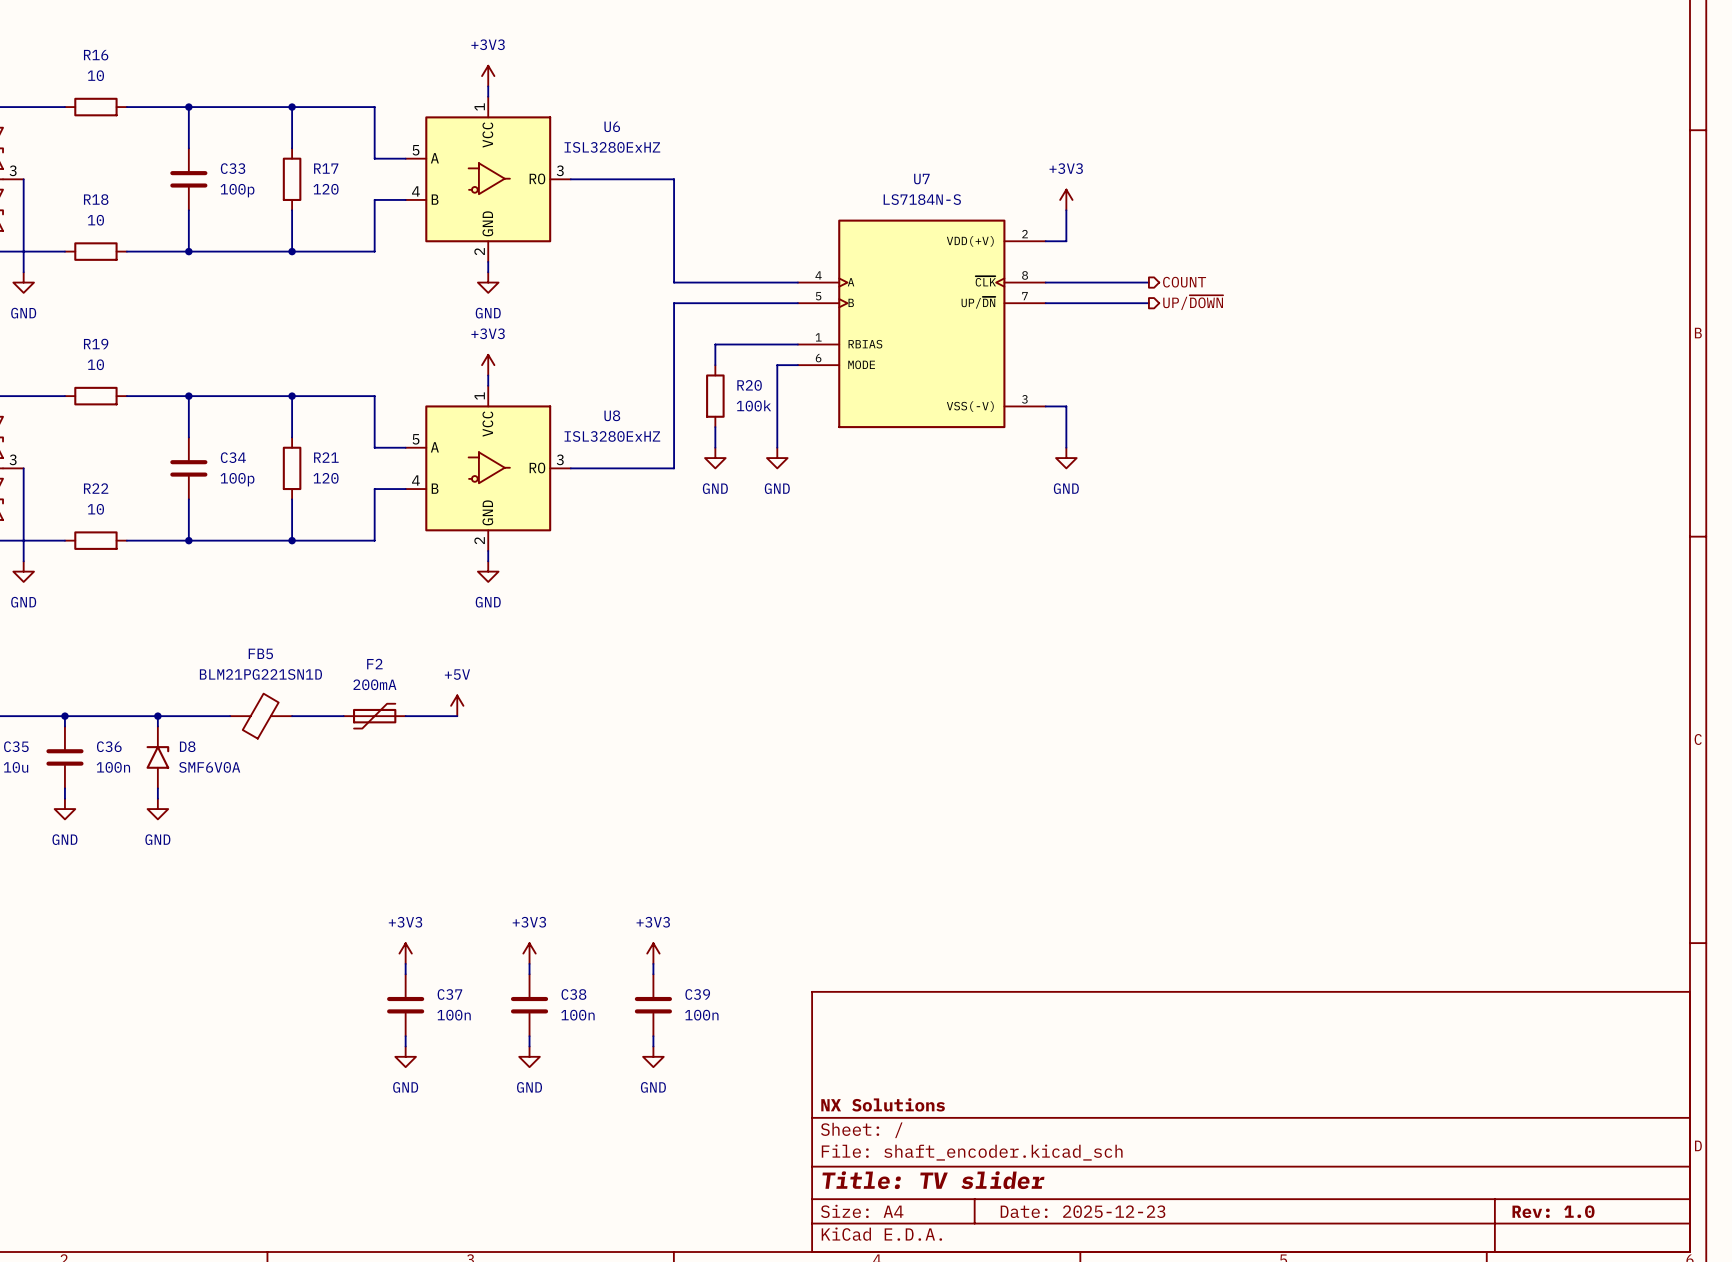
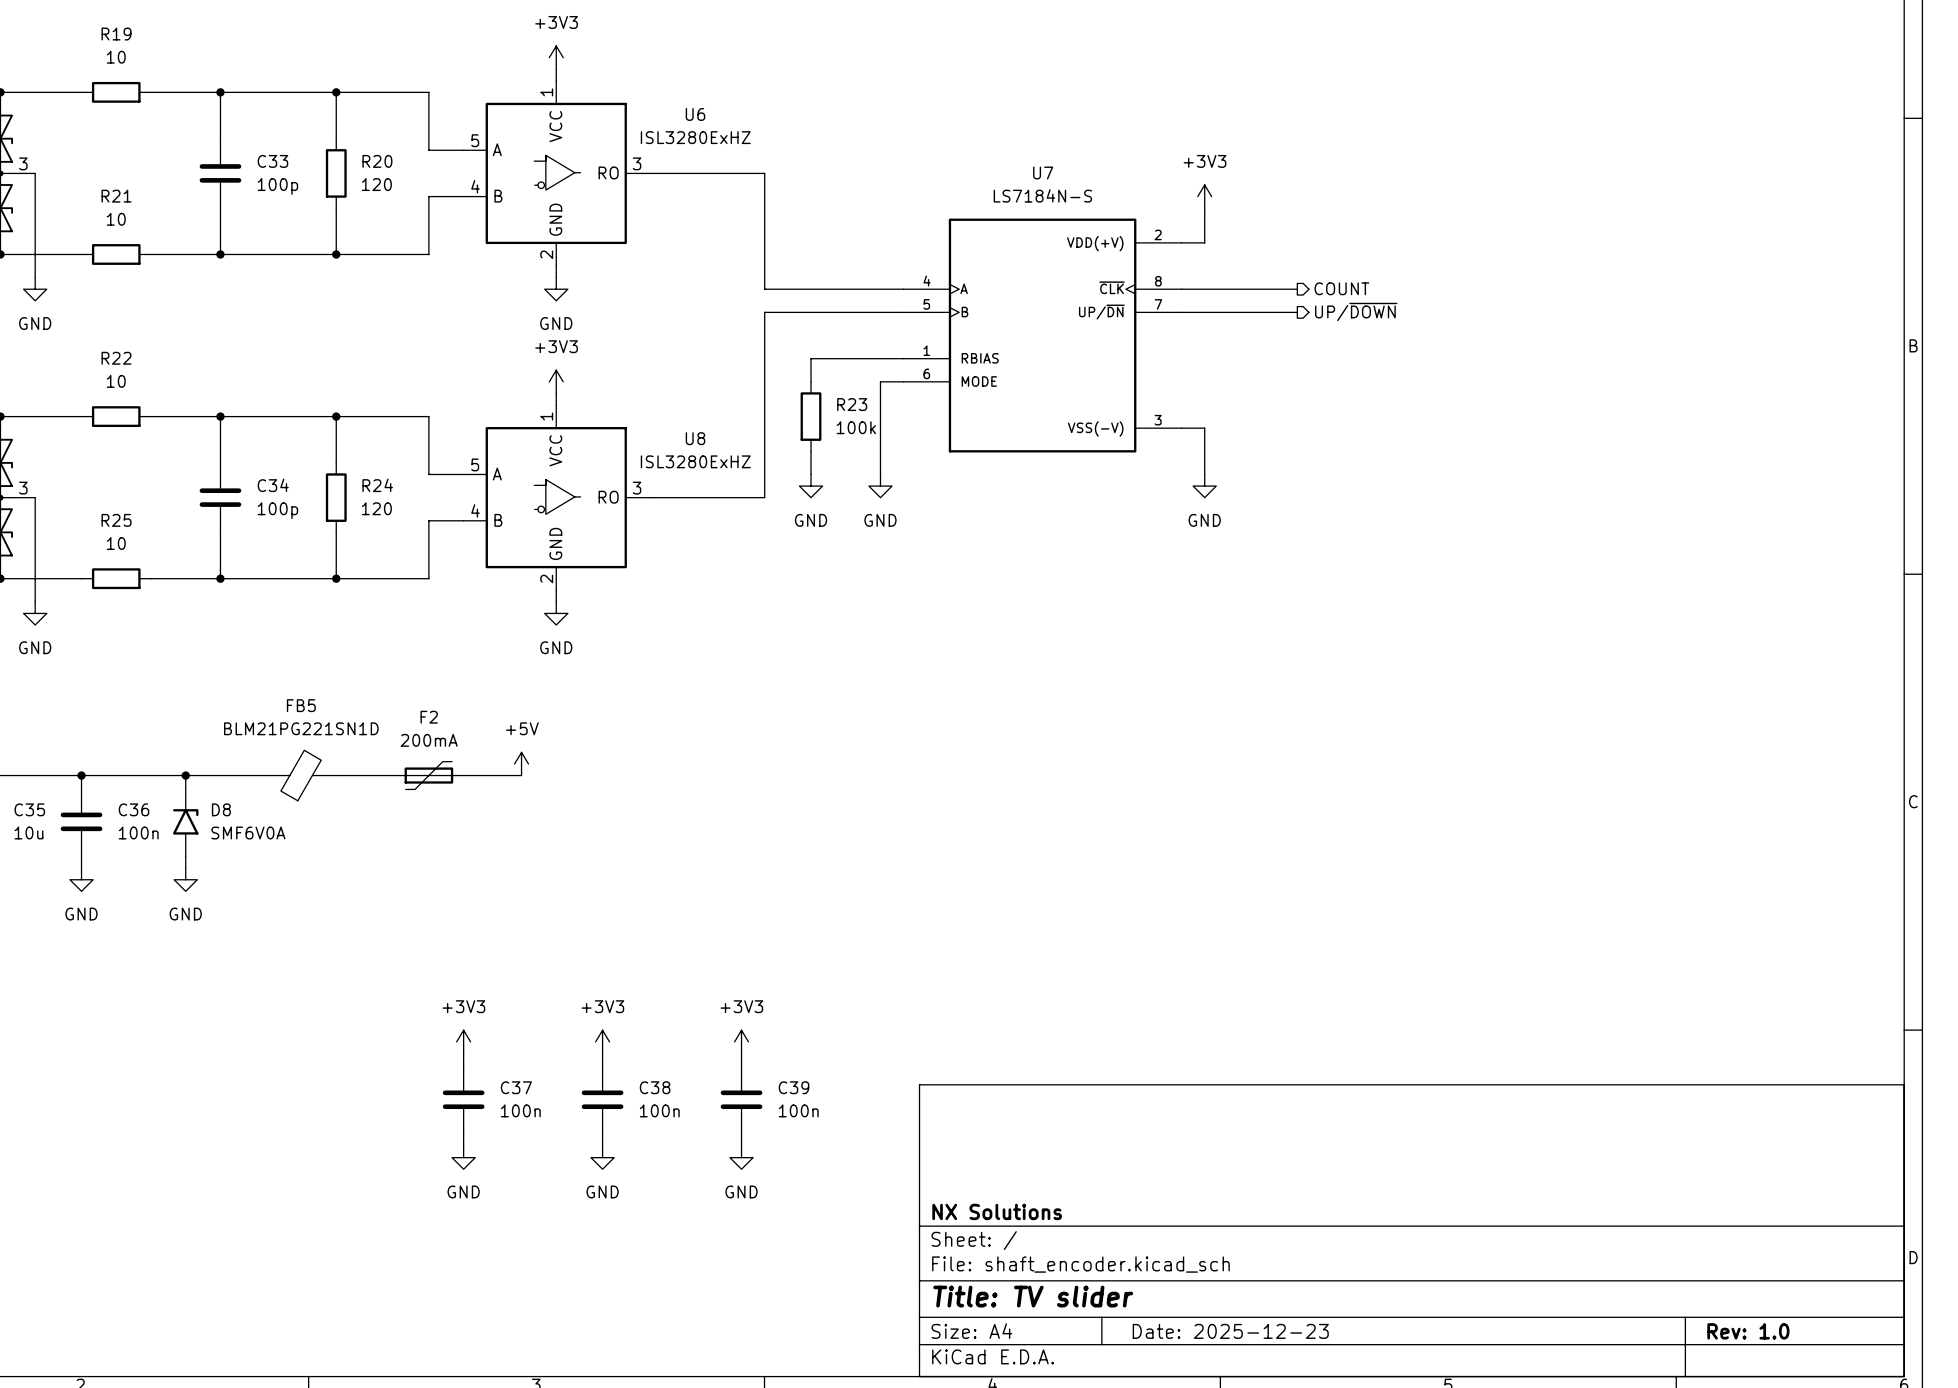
R16 name: R16 (96, 55) -> R19 (116, 34)
R17 name: R17 (326, 168) -> R20 (377, 161)
R18 name: R18 (96, 199) -> R21 (116, 196)
R19 name: R19 (96, 344) -> R22 (116, 358)
R20 name: R20 (749, 385) -> R23 (852, 404)
R21 name: R21 (326, 457) -> R24 (377, 485)
R22 name: R22 (96, 488) -> R25 (116, 520)

